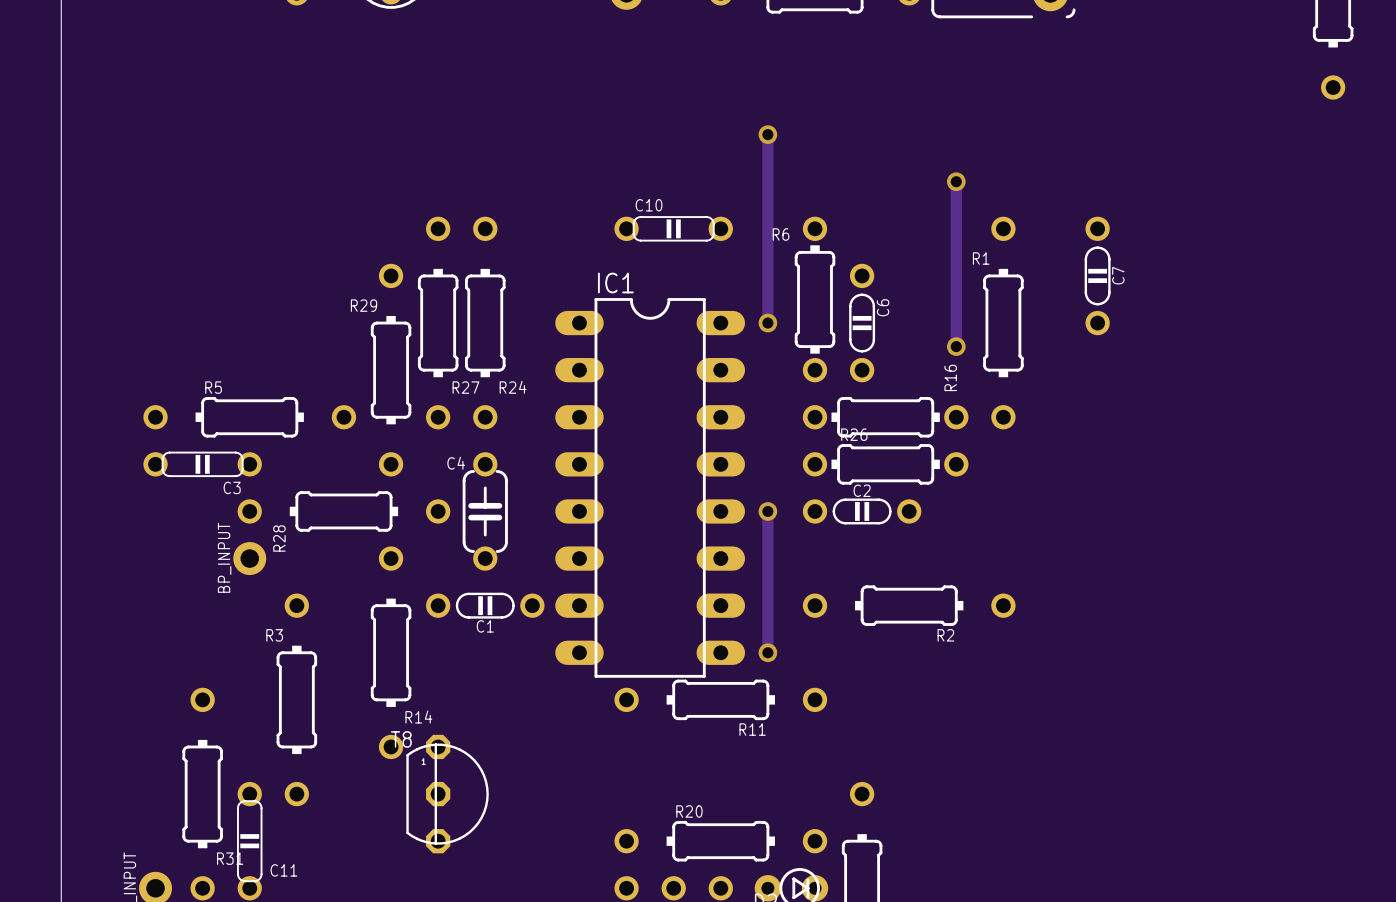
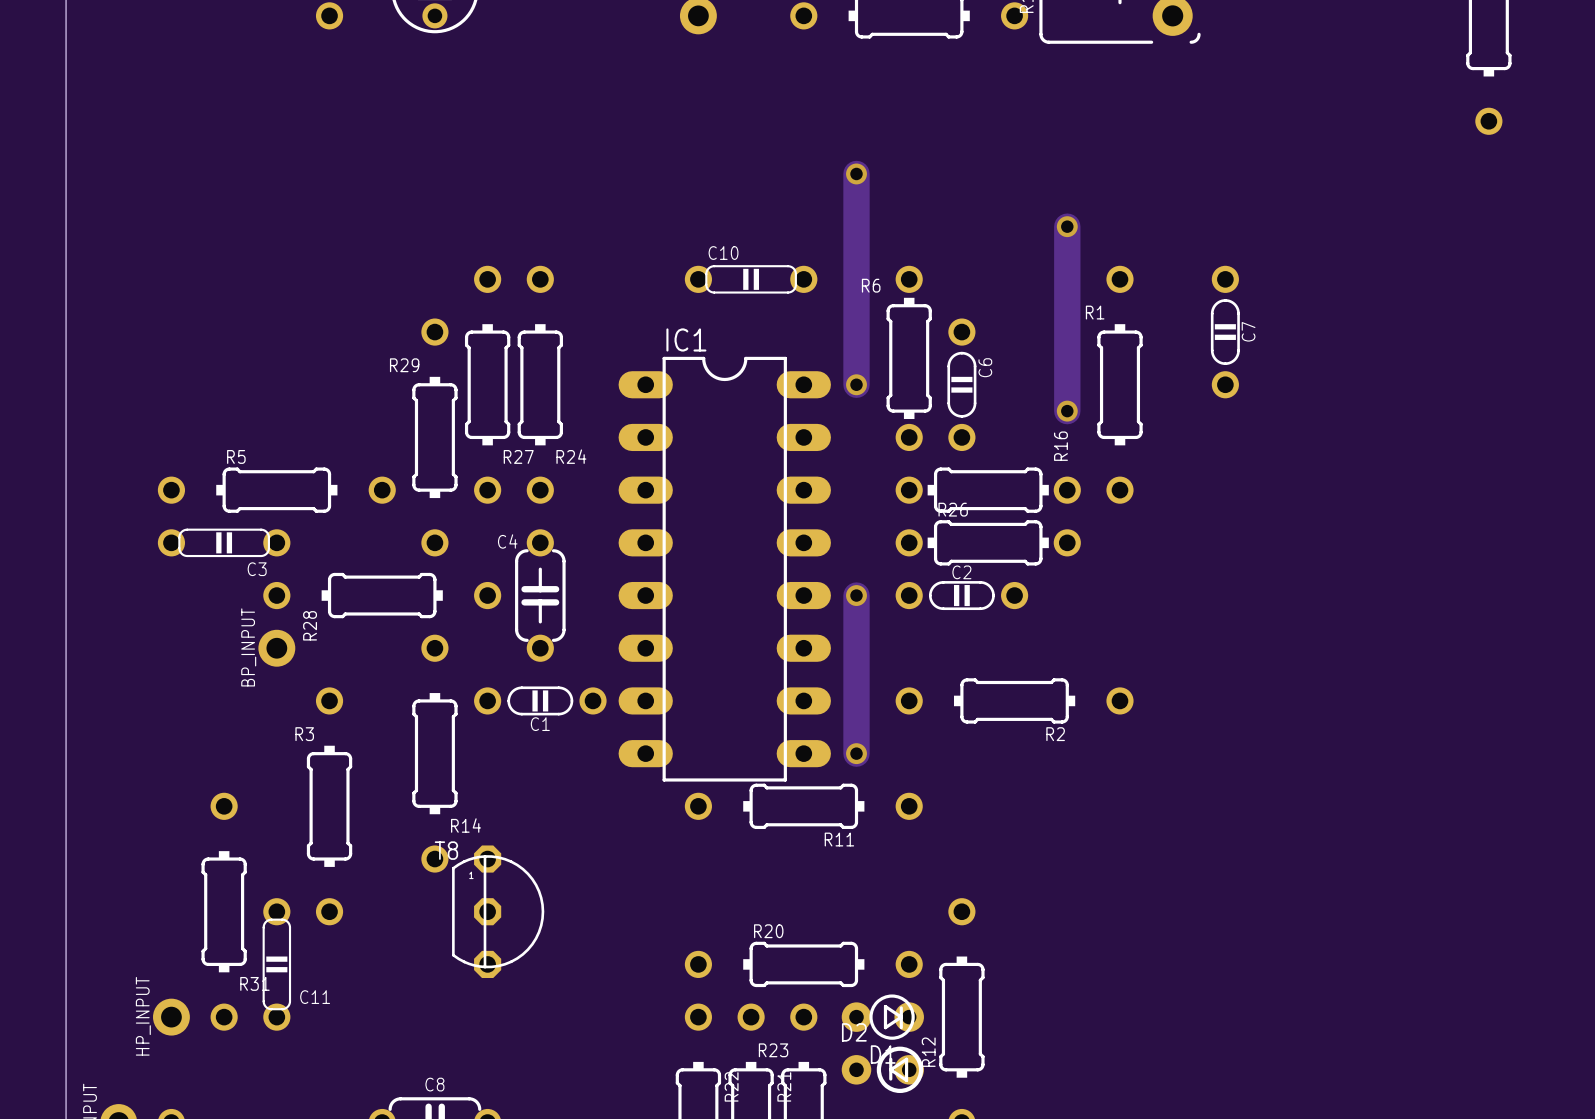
track width: thin (767, 134) (767, 323) -> thick (856, 173) (856, 384)
track width: thin (956, 181) (956, 346) -> thick (1067, 226) (1067, 411)
track width: thin (767, 511) (767, 652) -> thick (856, 595) (856, 753)

